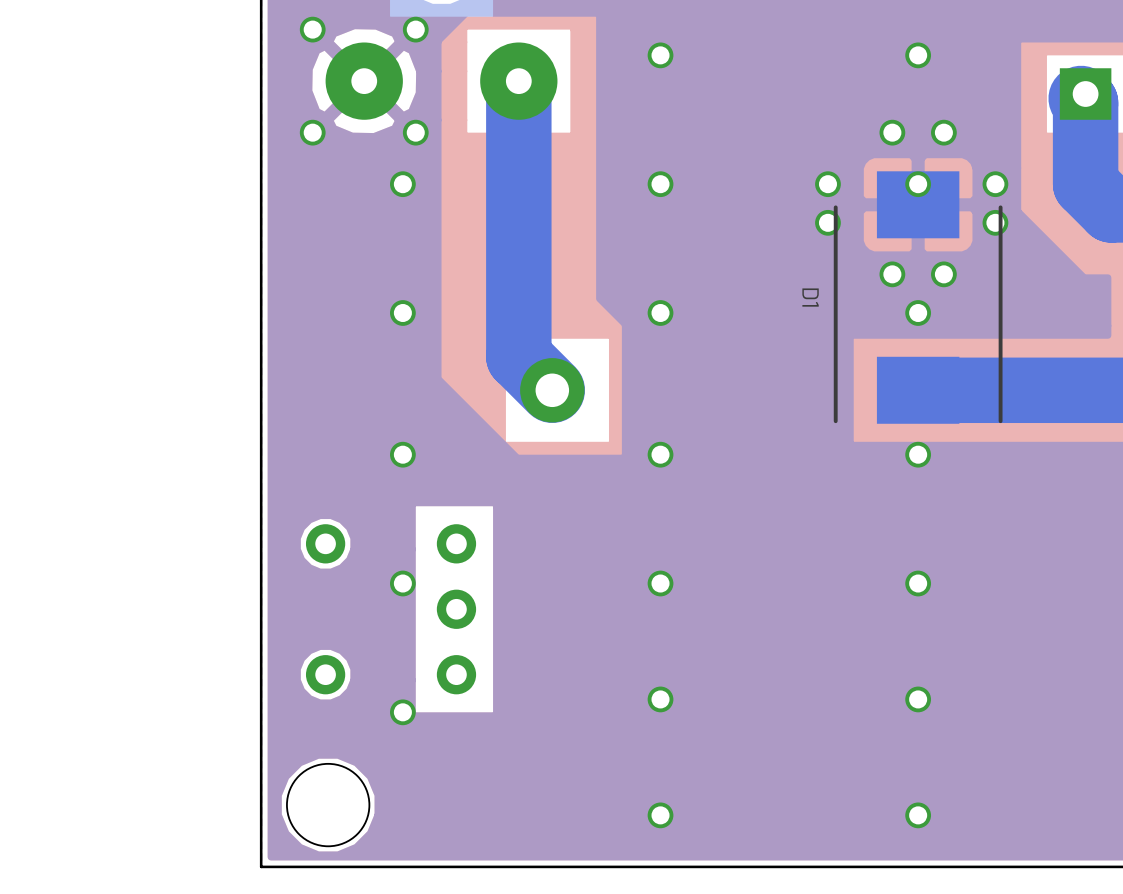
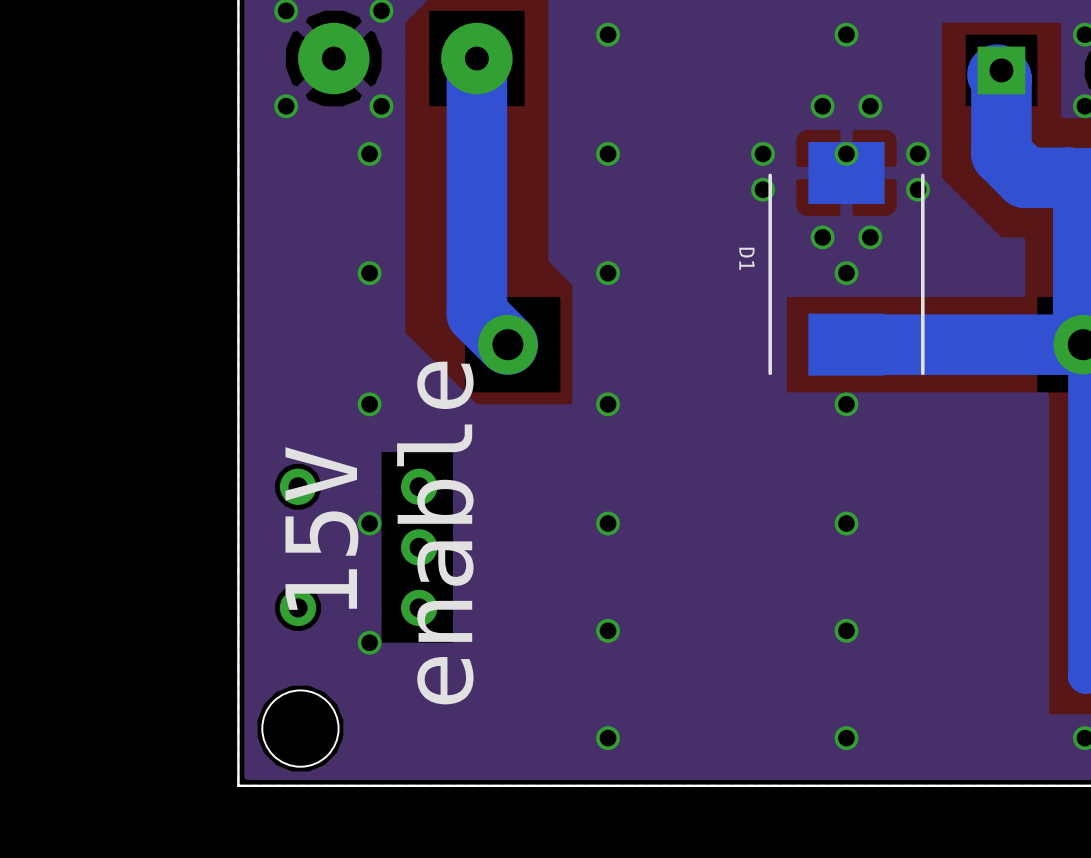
text: none -> 15V (321, 528)
text: none -> enable (435, 533)

